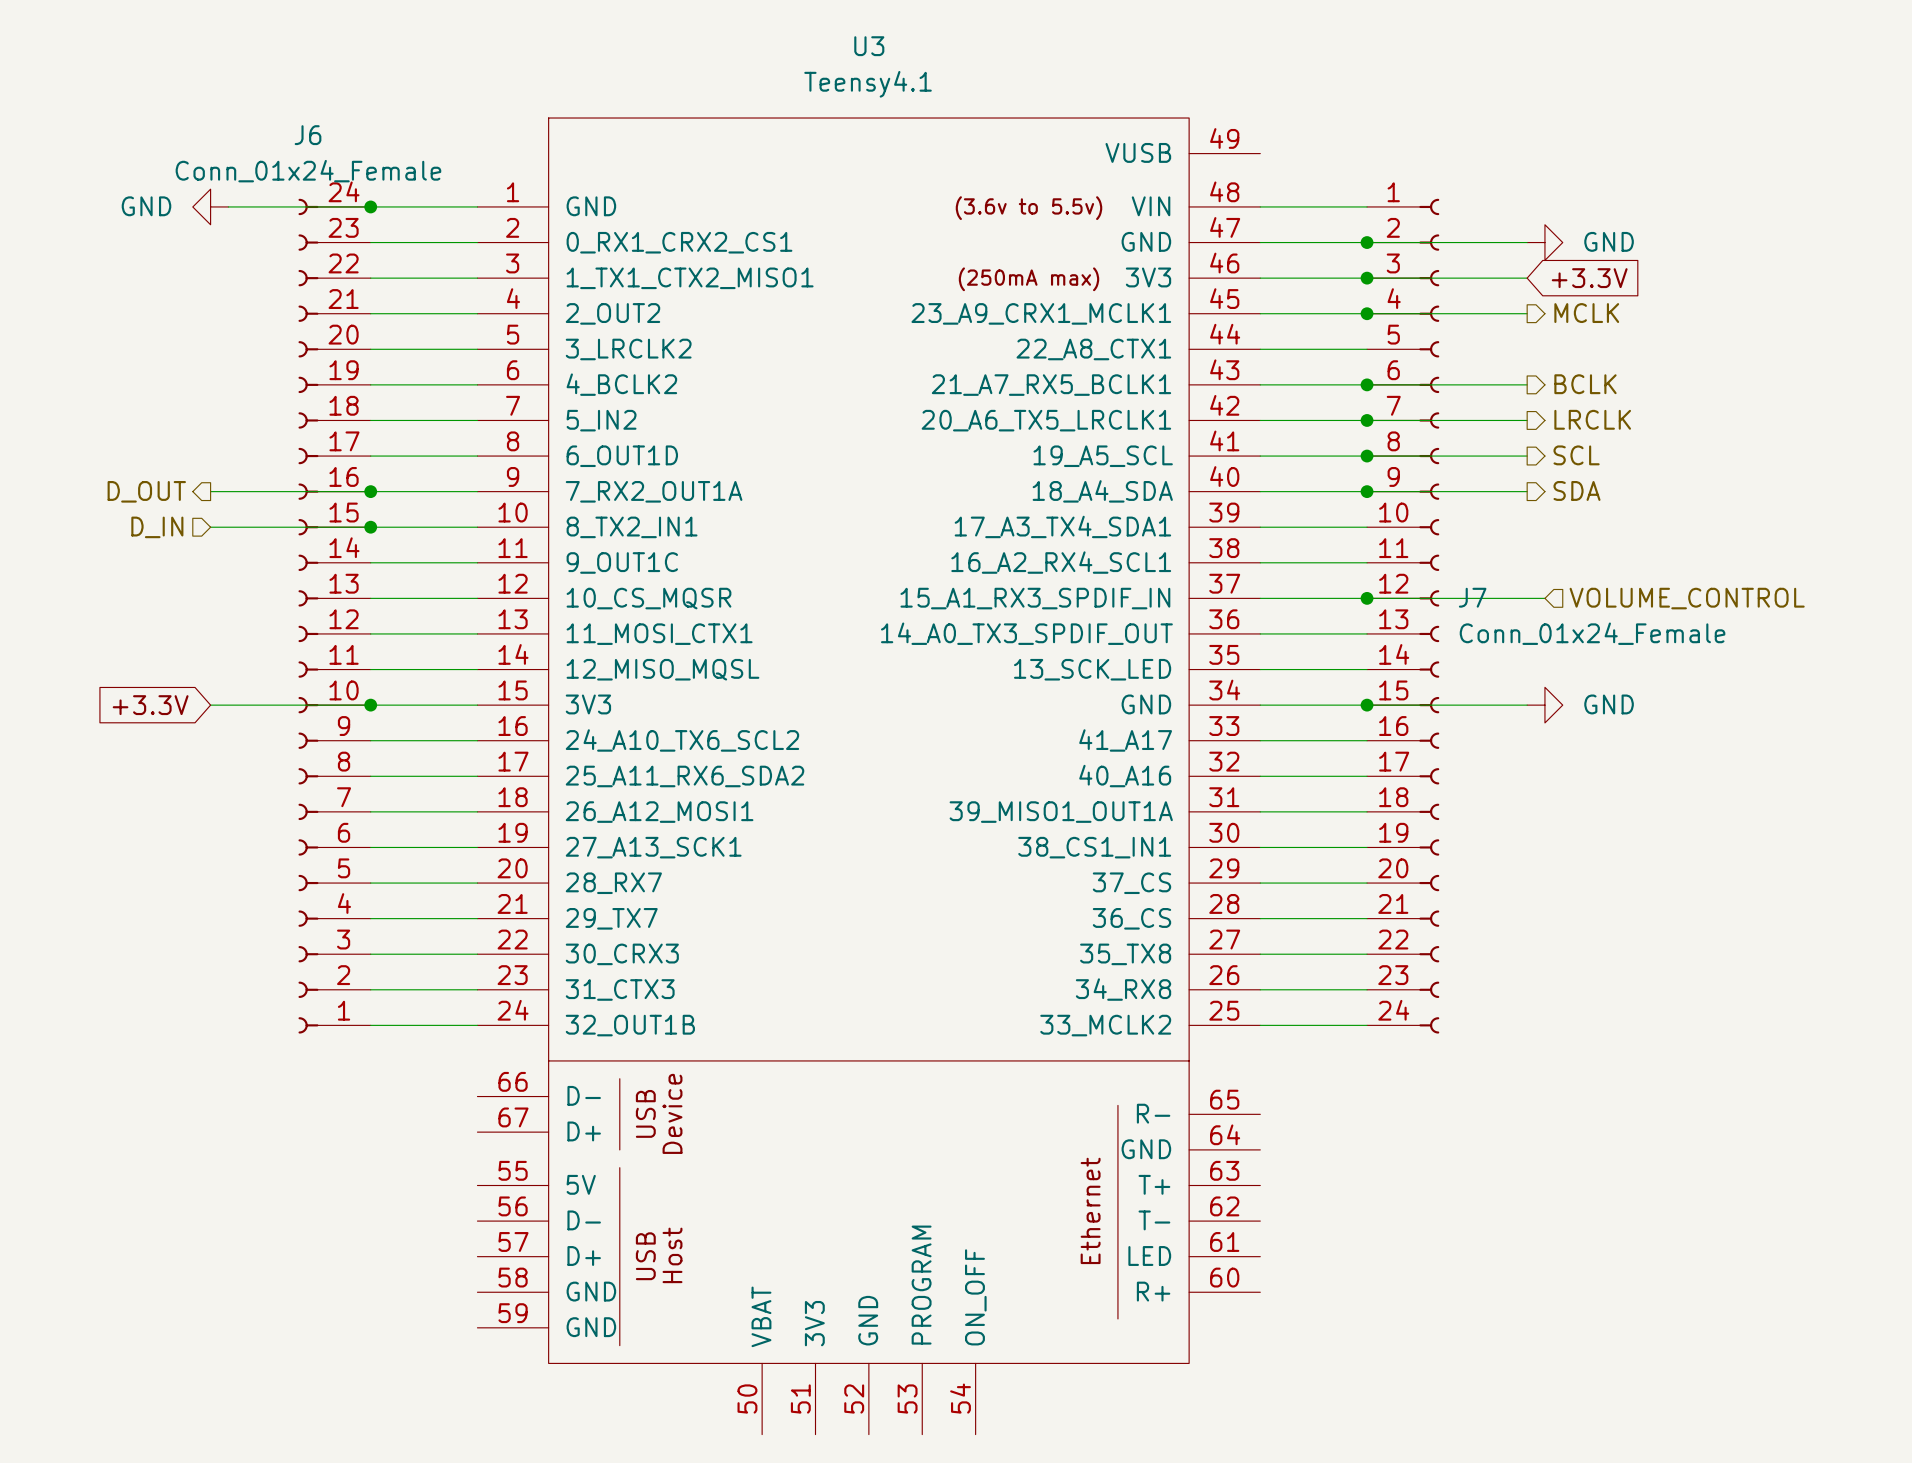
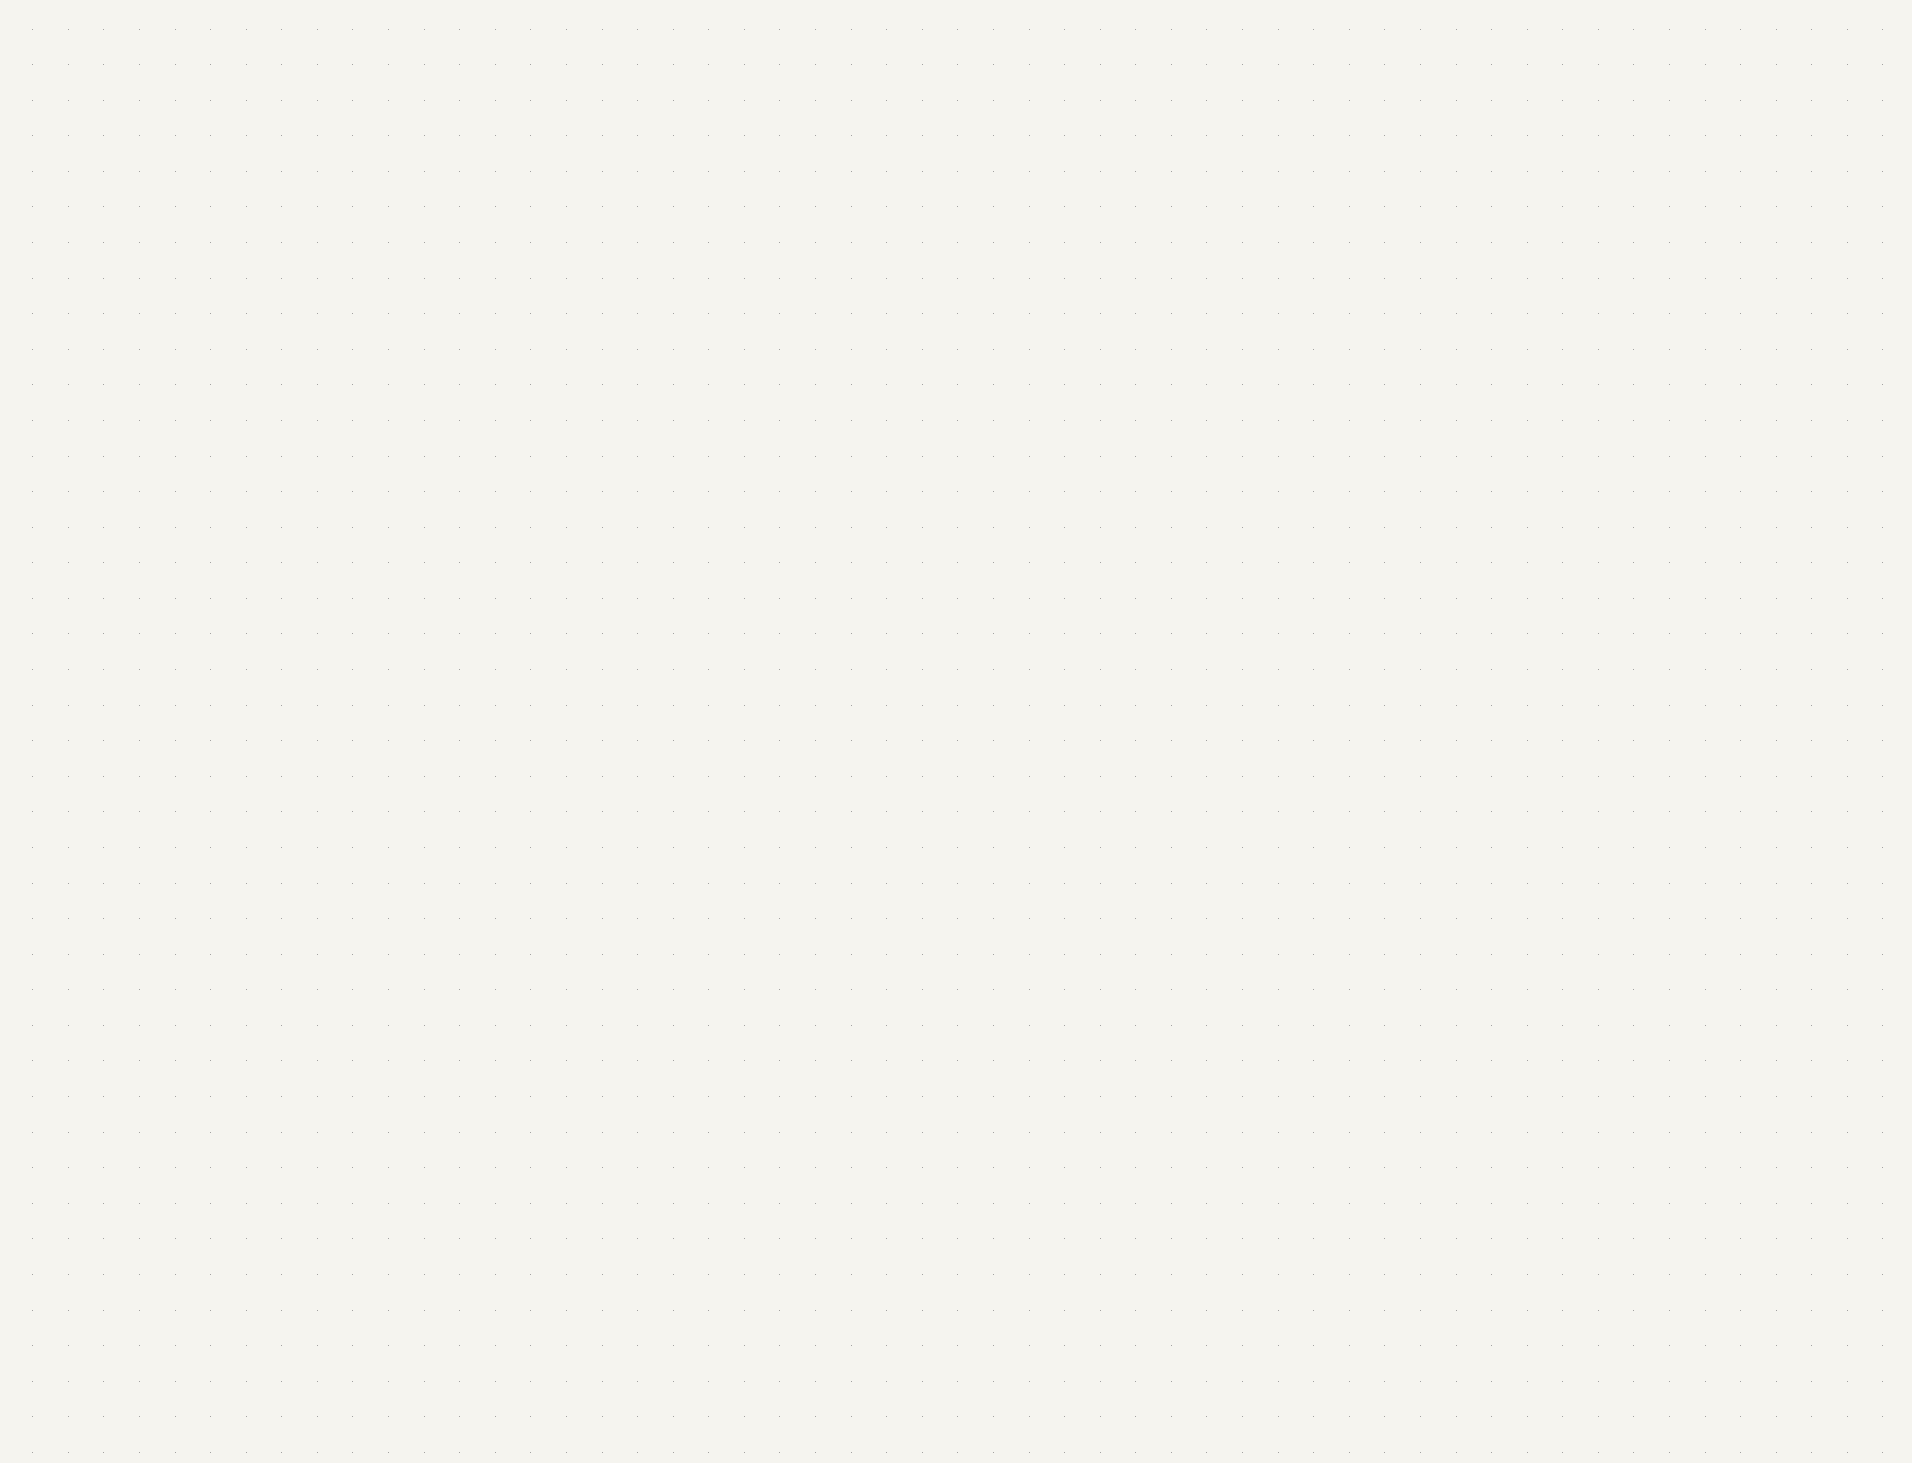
power symbol: GND (210, 206) -> none
wire: (228, 206) (477, 206) -> none
junction: (370, 206) -> none
wire: (1260, 206) (1367, 206) -> none
wire: (370, 242) (477, 242) -> none
wire: (1260, 242) (1527, 242) -> none
junction: (1367, 242) -> none
power symbol: GND (1544, 242) -> none
wire: (370, 278) (477, 278) -> none
wire: (1260, 278) (1527, 278) -> none
junction: (1367, 278) -> none
global label: +3.3V (1589, 278) -> none
wire: (370, 313) (477, 313) -> none
wire: (1260, 313) (1527, 313) -> none
junction: (1367, 313) -> none
hierarchical label: MCLK (1586, 313) -> none
wire: (370, 349) (477, 349) -> none
wire: (1260, 349) (1367, 349) -> none
wire: (370, 384) (477, 384) -> none
wire: (1260, 384) (1527, 384) -> none
junction: (1367, 384) -> none
hierarchical label: BCLK (1585, 384) -> none
hierarchical label: LRCLK (1592, 419) -> none
wire: (370, 420) (477, 420) -> none
wire: (1260, 420) (1527, 420) -> none
junction: (1367, 420) -> none
hierarchical label: SCL (1576, 455) -> none
wire: (370, 456) (477, 456) -> none
wire: (1260, 456) (1527, 456) -> none
junction: (1367, 456) -> none
hierarchical label: SDA (1577, 490) -> none
hierarchical label: D_OUT (146, 491) -> none
wire: (210, 491) (477, 491) -> none
junction: (370, 491) -> none
wire: (1260, 491) (1527, 491) -> none
junction: (1367, 491) -> none
hierarchical label: D_IN (157, 527) -> none
wire: (210, 527) (477, 527) -> none
junction: (370, 527) -> none
wire: (1260, 527) (1367, 527) -> none
wire: (370, 562) (477, 562) -> none
wire: (1260, 562) (1367, 562) -> none
wire: (370, 598) (477, 598) -> none
wire: (1260, 598) (1544, 598) -> none
junction: (1367, 598) -> none
hierarchical label: VOLUME_CONTROL (1687, 598) -> none
J6: Conn_01x24_Female (334, 616) -> none
J7: Conn_01x24_Female (1403, 616) -> none
wire: (370, 633) (477, 633) -> none
wire: (1260, 633) (1367, 633) -> none
wire: (370, 669) (477, 669) -> none
wire: (1260, 669) (1367, 669) -> none
global label: +3.3V (150, 705) -> none
wire: (210, 705) (477, 705) -> none
junction: (370, 705) -> none
wire: (1260, 705) (1527, 705) -> none
junction: (1367, 705) -> none
power symbol: GND (1544, 705) -> none
wire: (370, 740) (477, 740) -> none
wire: (1260, 740) (1367, 740) -> none
wire: (370, 776) (477, 776) -> none
U3: Teensy4.1 (868, 776) -> none
wire: (1260, 776) (1367, 776) -> none
wire: (370, 811) (477, 811) -> none
wire: (1260, 811) (1367, 811) -> none
wire: (370, 847) (477, 847) -> none
wire: (1260, 847) (1367, 847) -> none
wire: (370, 883) (477, 883) -> none
wire: (1260, 883) (1367, 883) -> none
wire: (370, 918) (477, 918) -> none
wire: (1260, 918) (1367, 918) -> none
wire: (370, 954) (477, 954) -> none
wire: (1260, 954) (1367, 954) -> none
wire: (370, 989) (477, 989) -> none
wire: (1260, 989) (1367, 989) -> none
wire: (370, 1025) (477, 1025) -> none
wire: (1260, 1025) (1367, 1025) -> none

